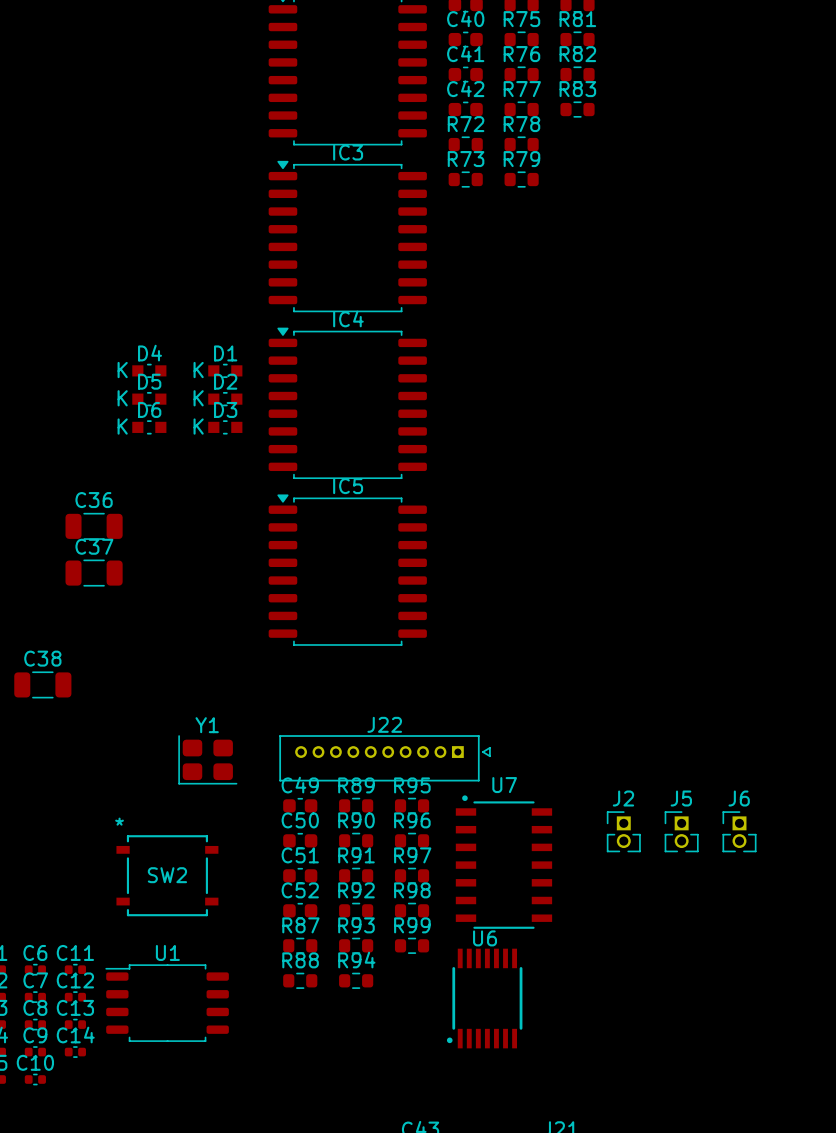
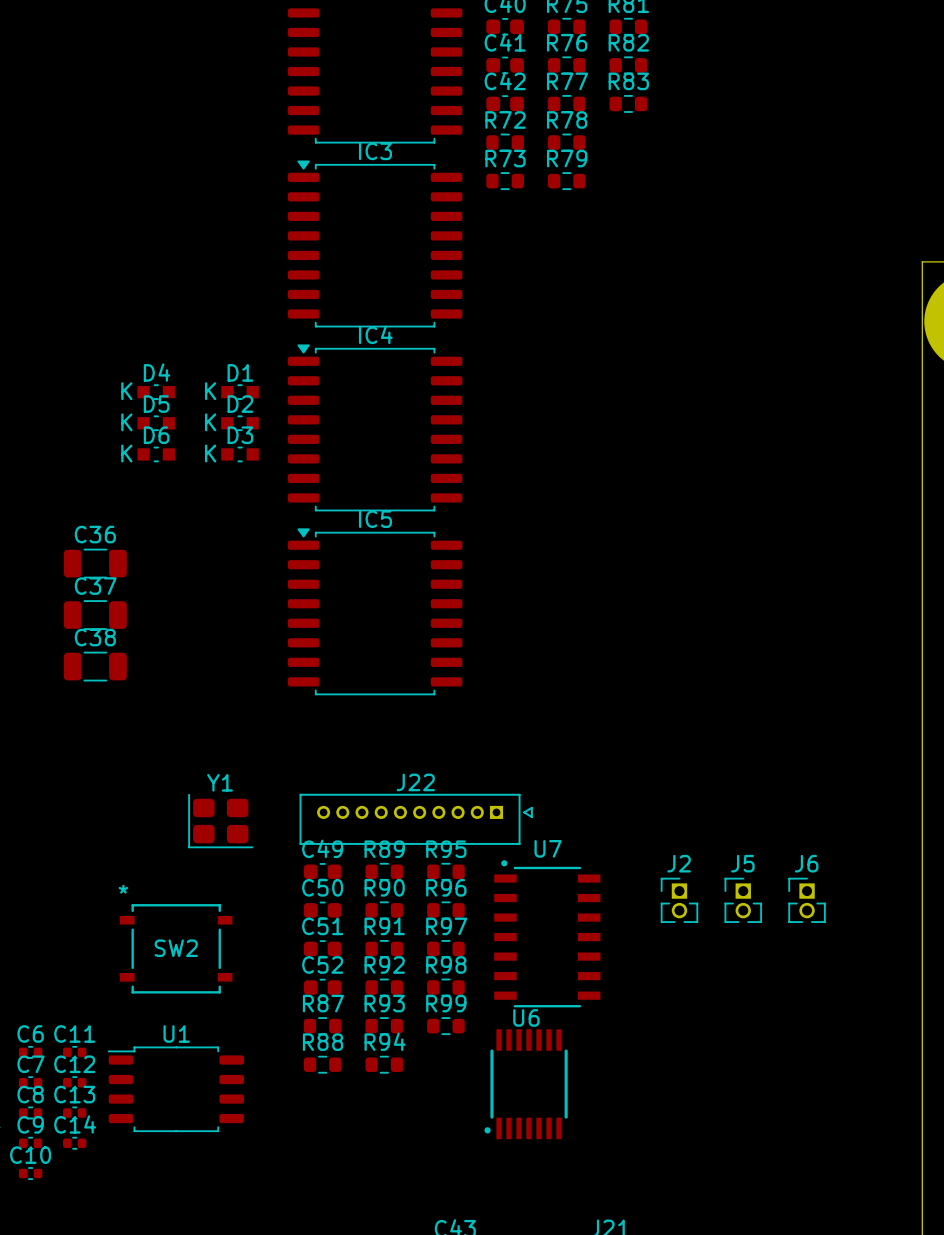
C38 position: (42, 684) -> (95, 666)

